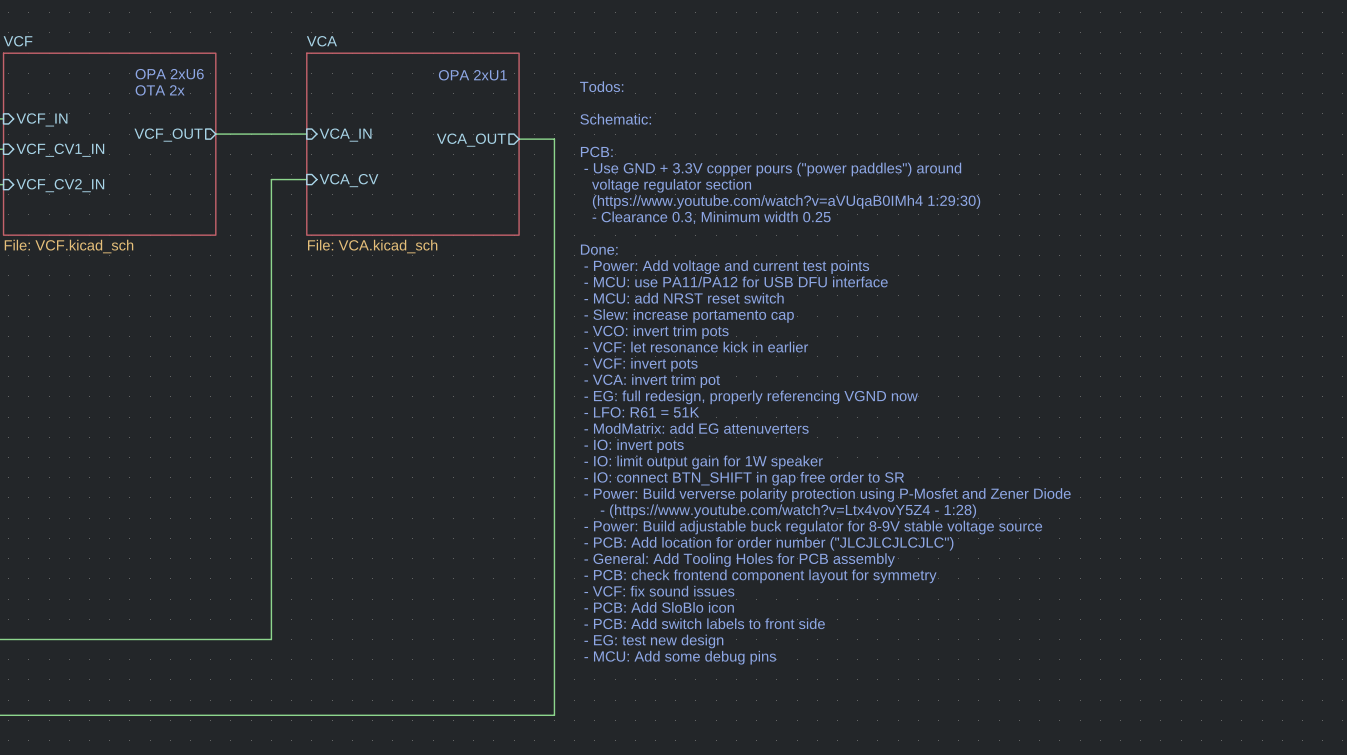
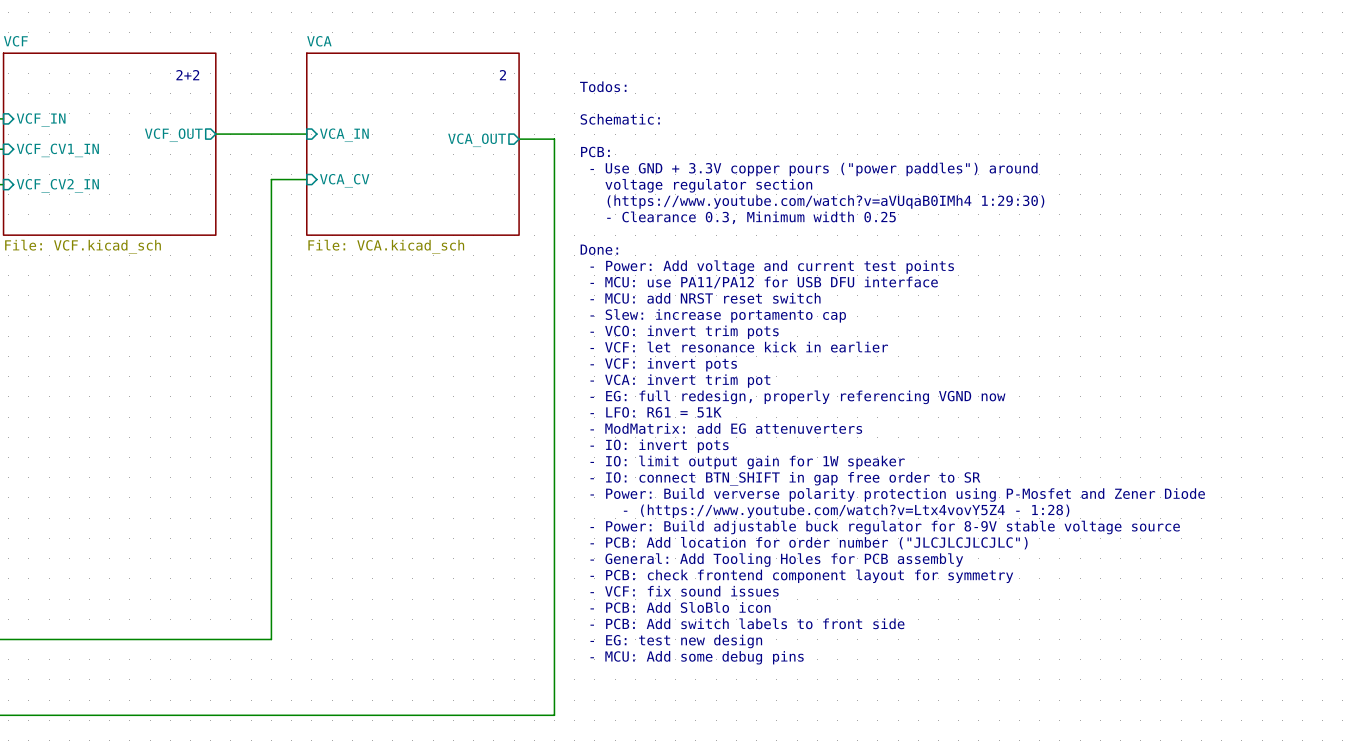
text: OPA 2xU6 (169, 74) -> none
text: none -> 2+2 (187, 75)
text: OPA 2xU1 (472, 75) -> none
text: none -> 2 (502, 75)
text: OTA 2x (160, 90) -> none

